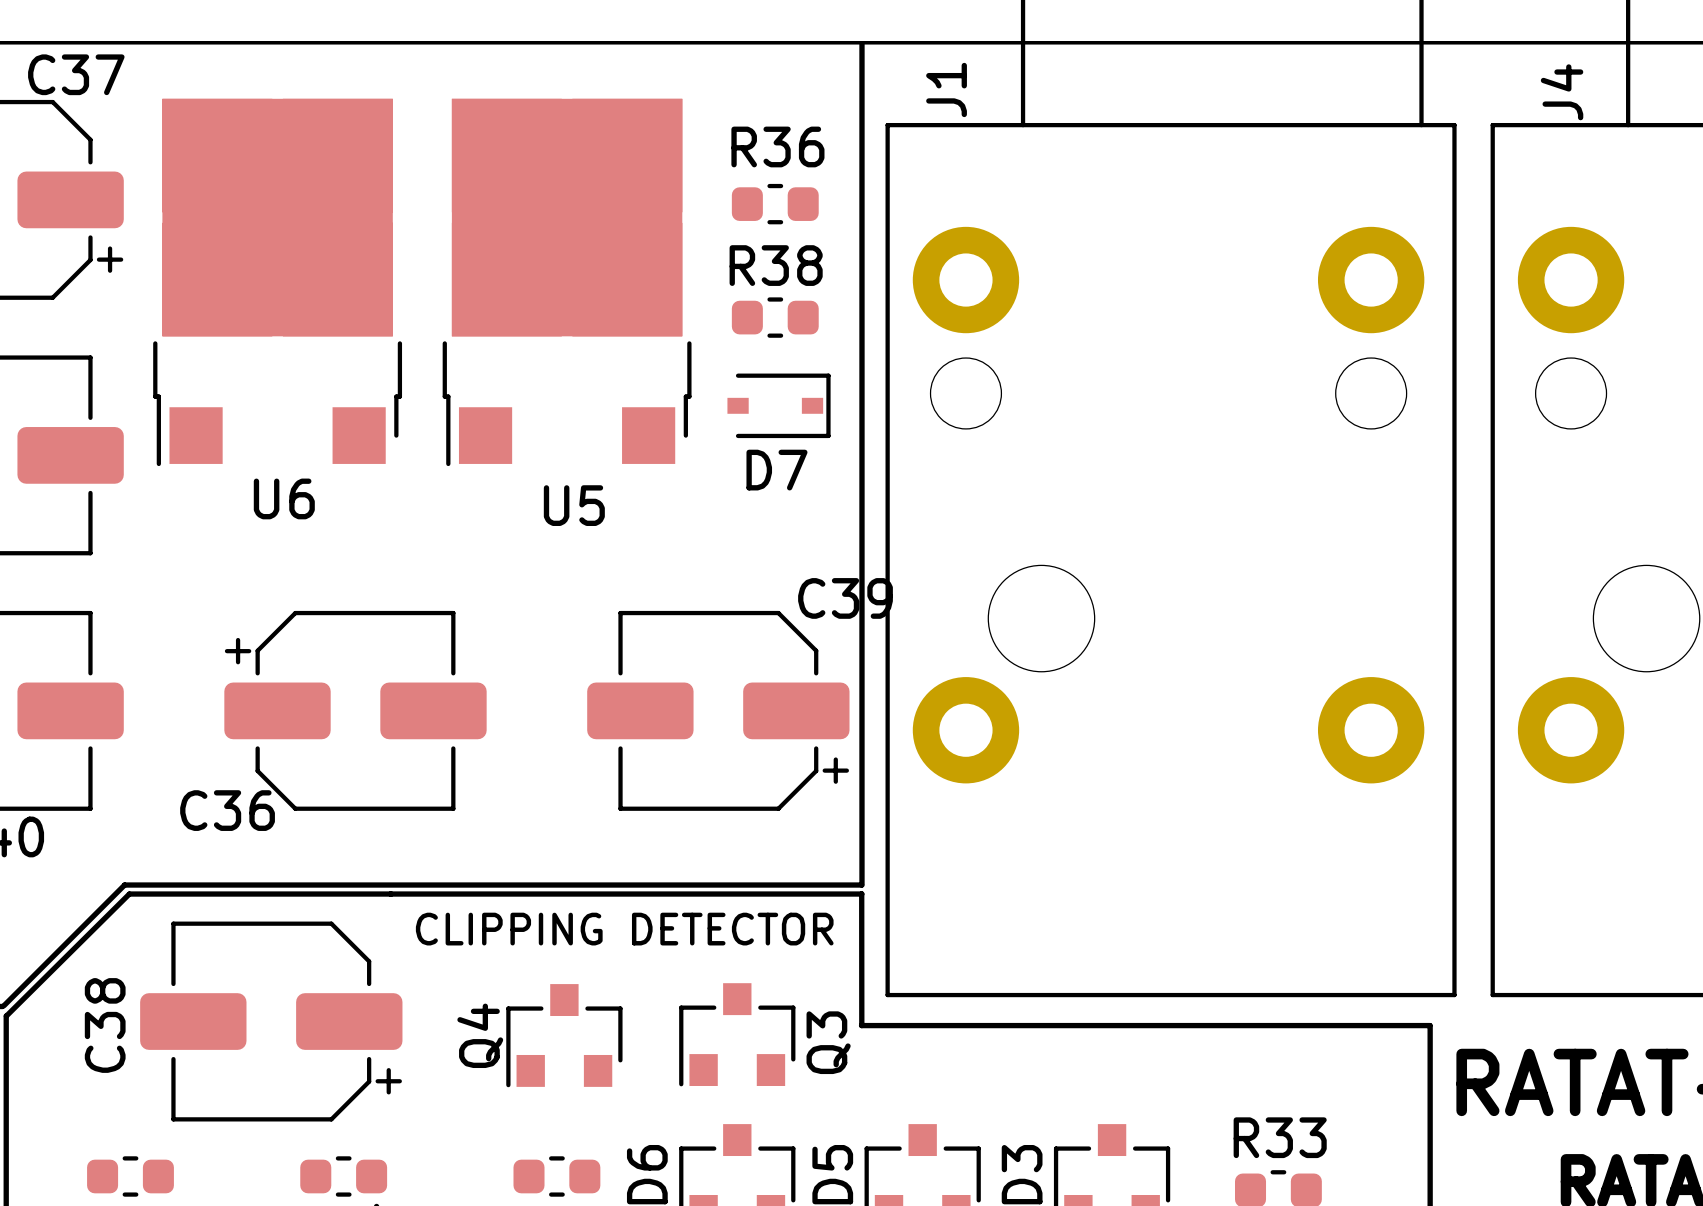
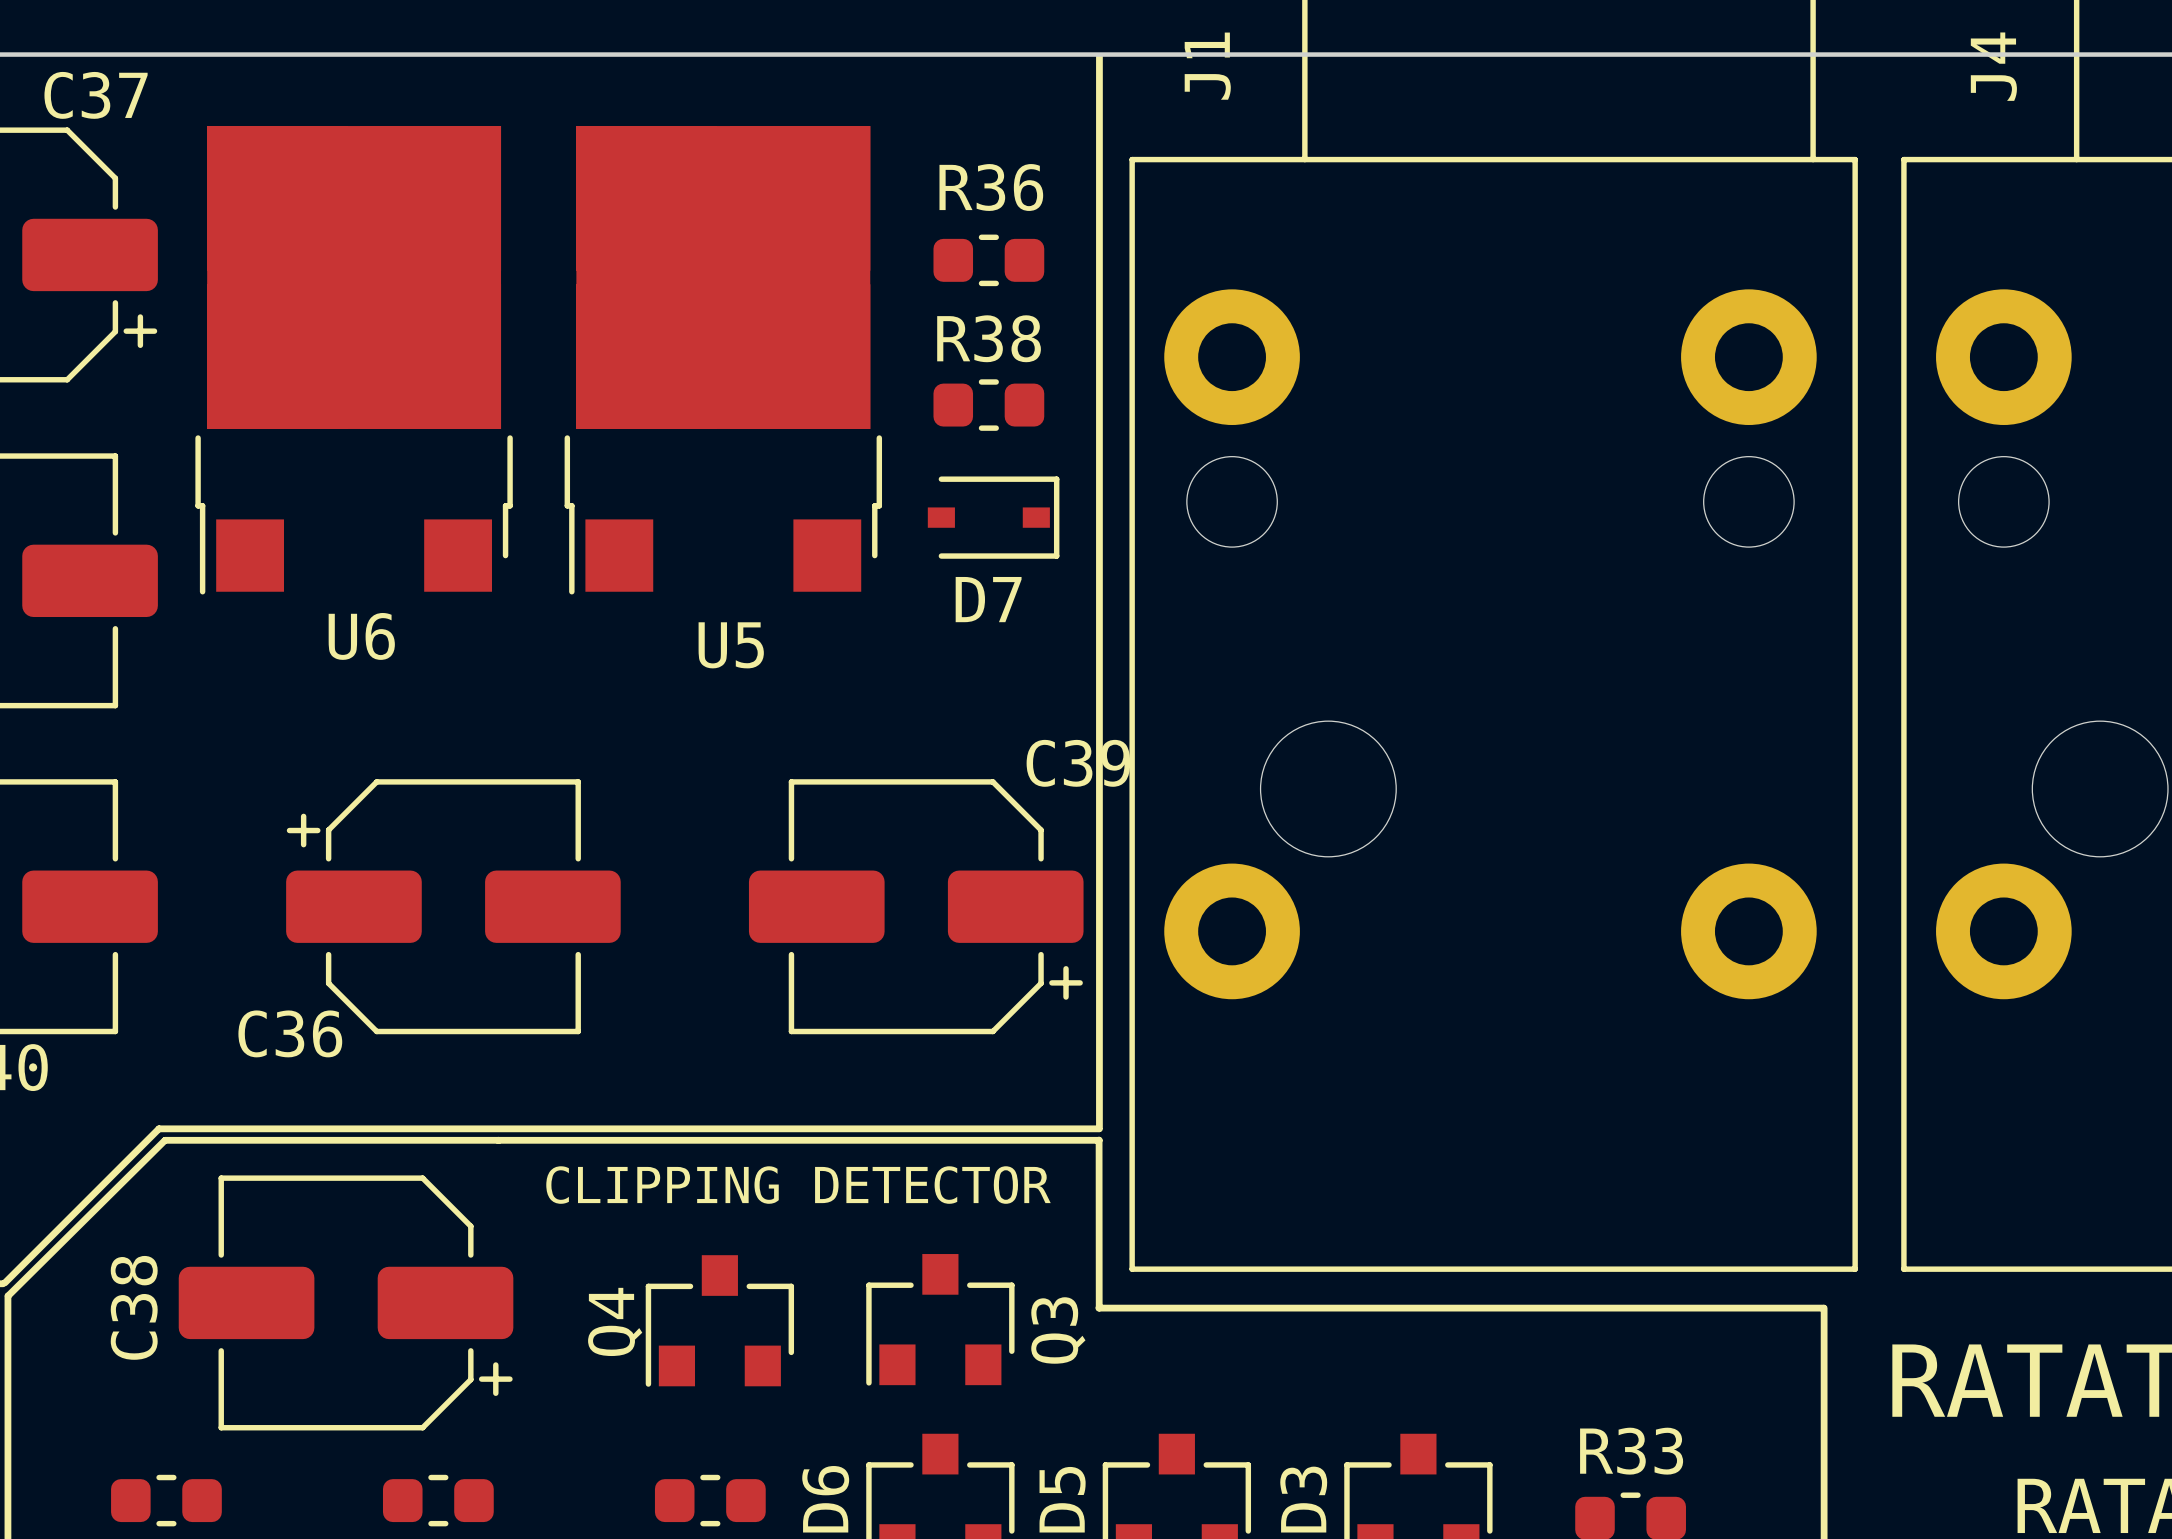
J1 name position: J1 (946, 89) -> J1 (1207, 66)
J4 name position: J4 (1562, 92) -> J4 (1993, 66)

